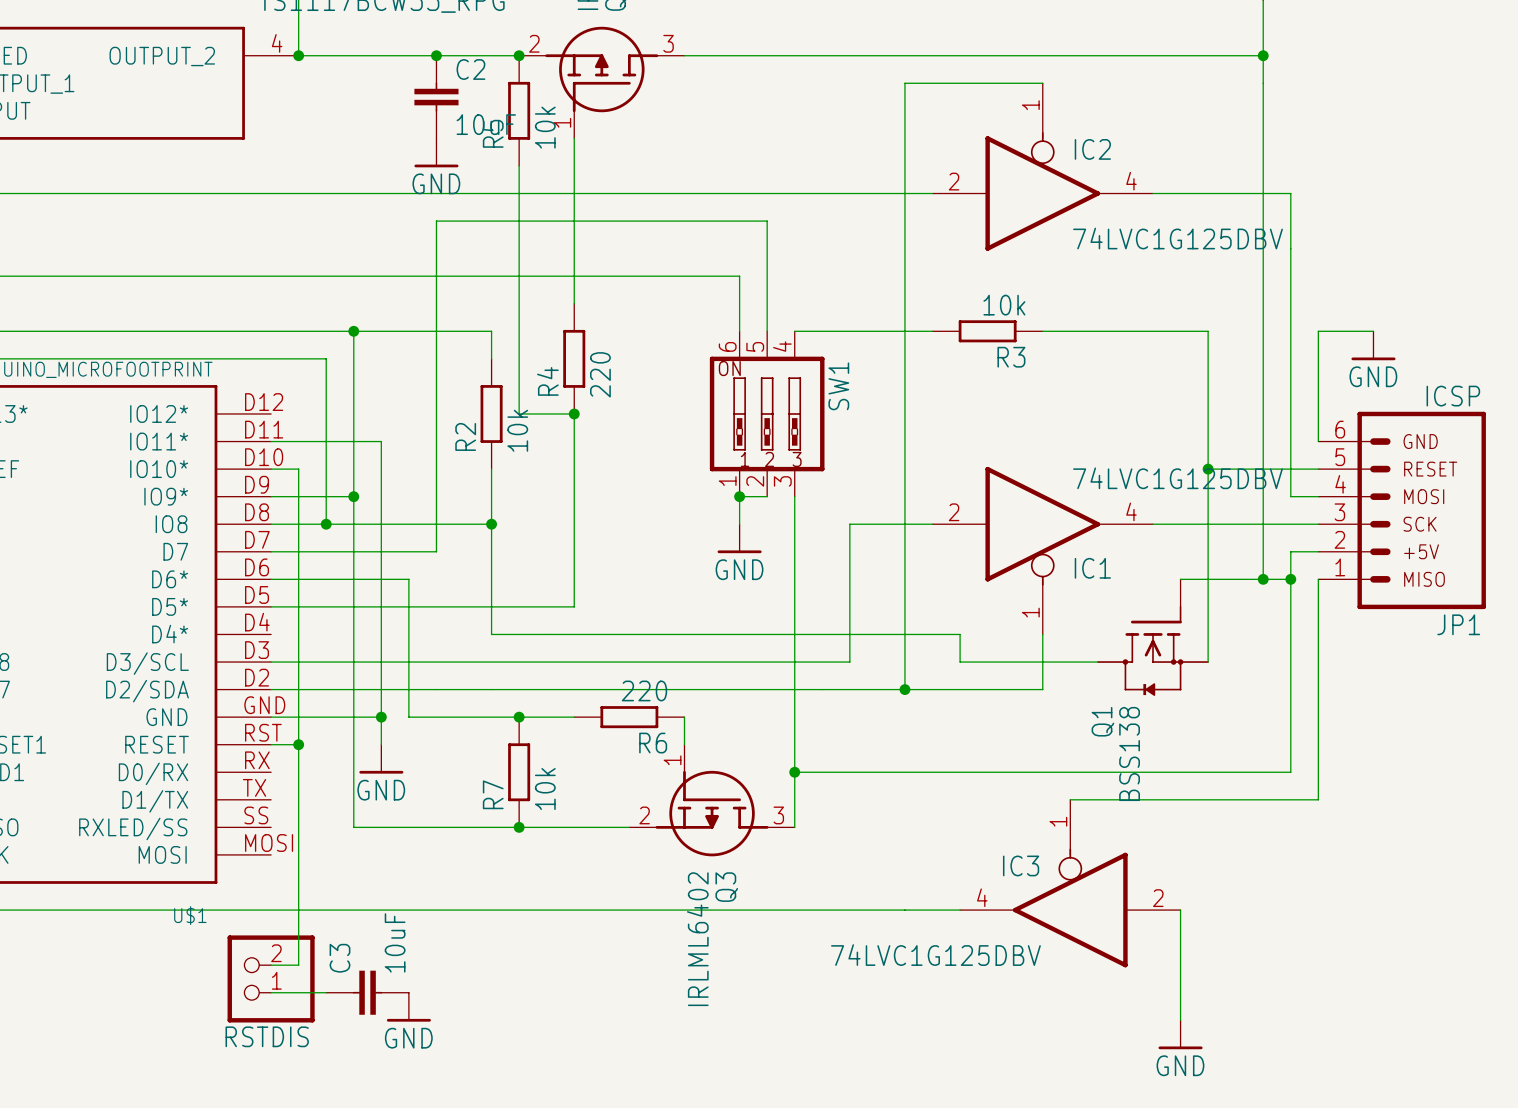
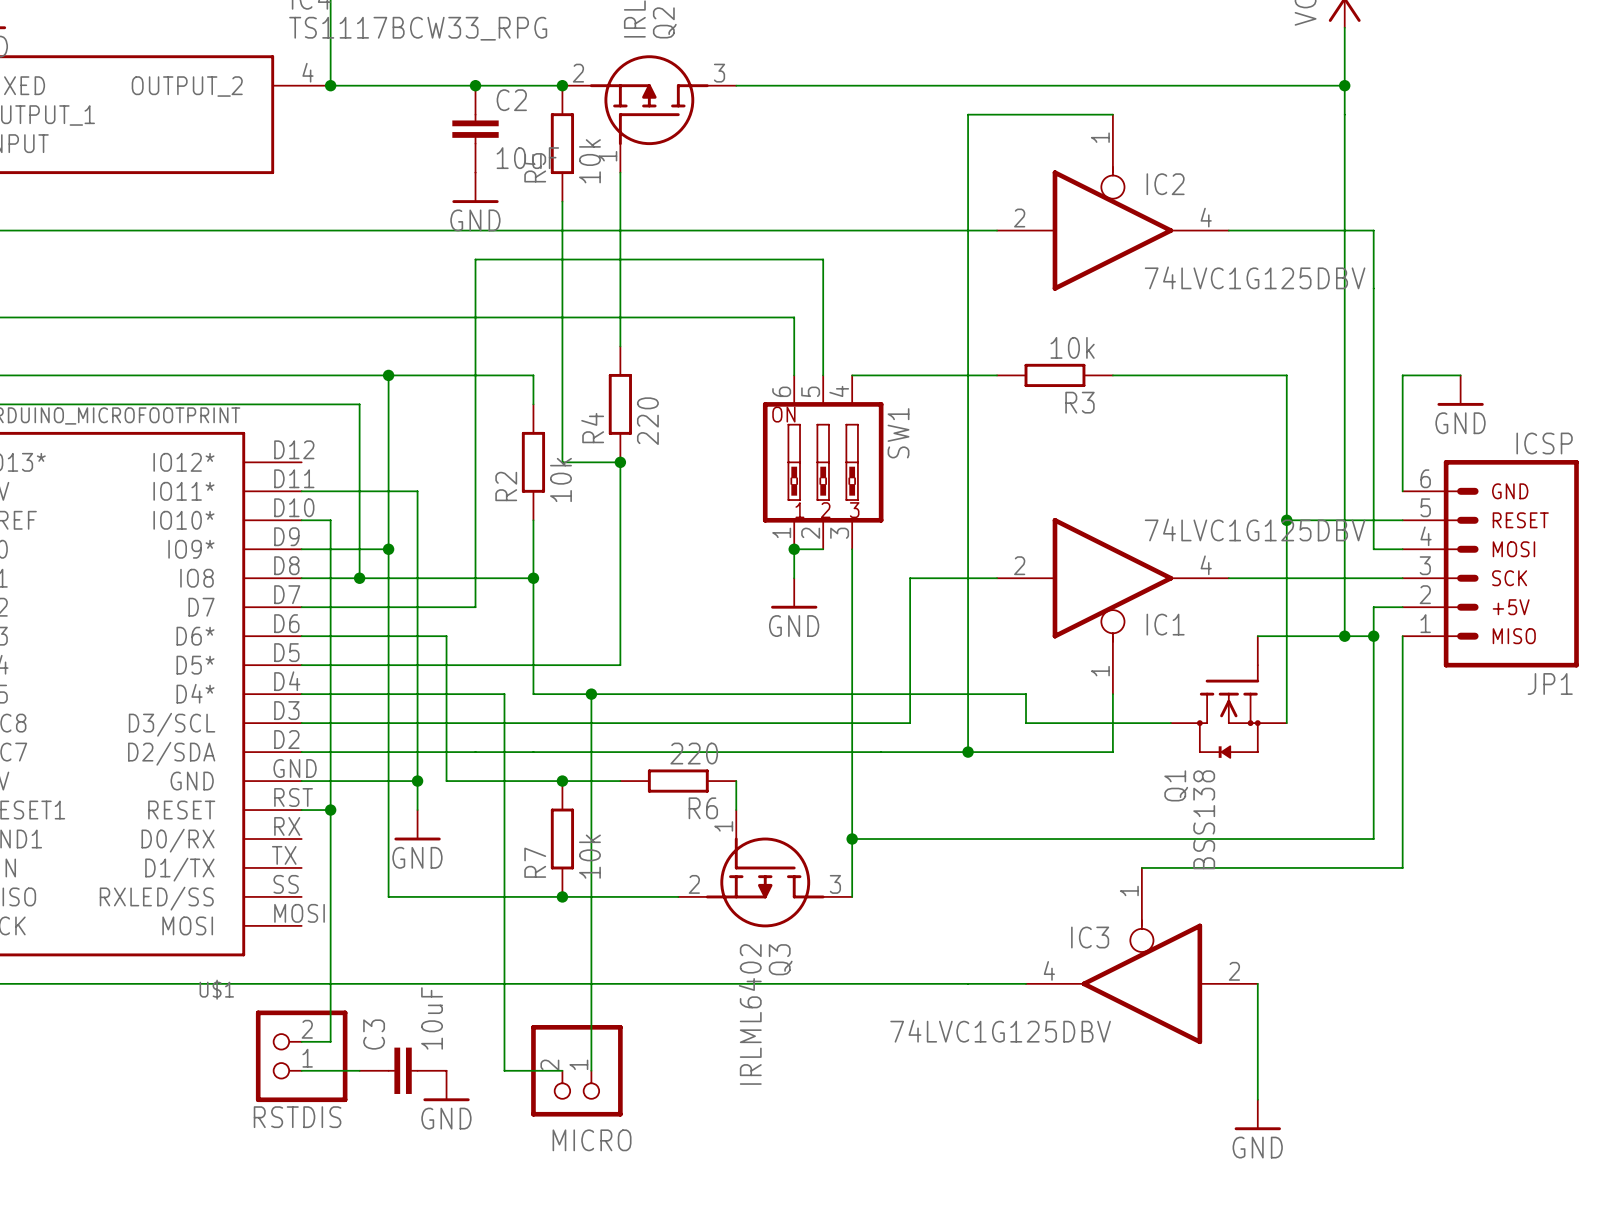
wire: none -> (301, 694) (504, 694) (504, 1070) (562, 1070)
wire: none -> (591, 694) (591, 1070)
junction: none -> (591, 694)
MICRO: none -> (576, 1070)

